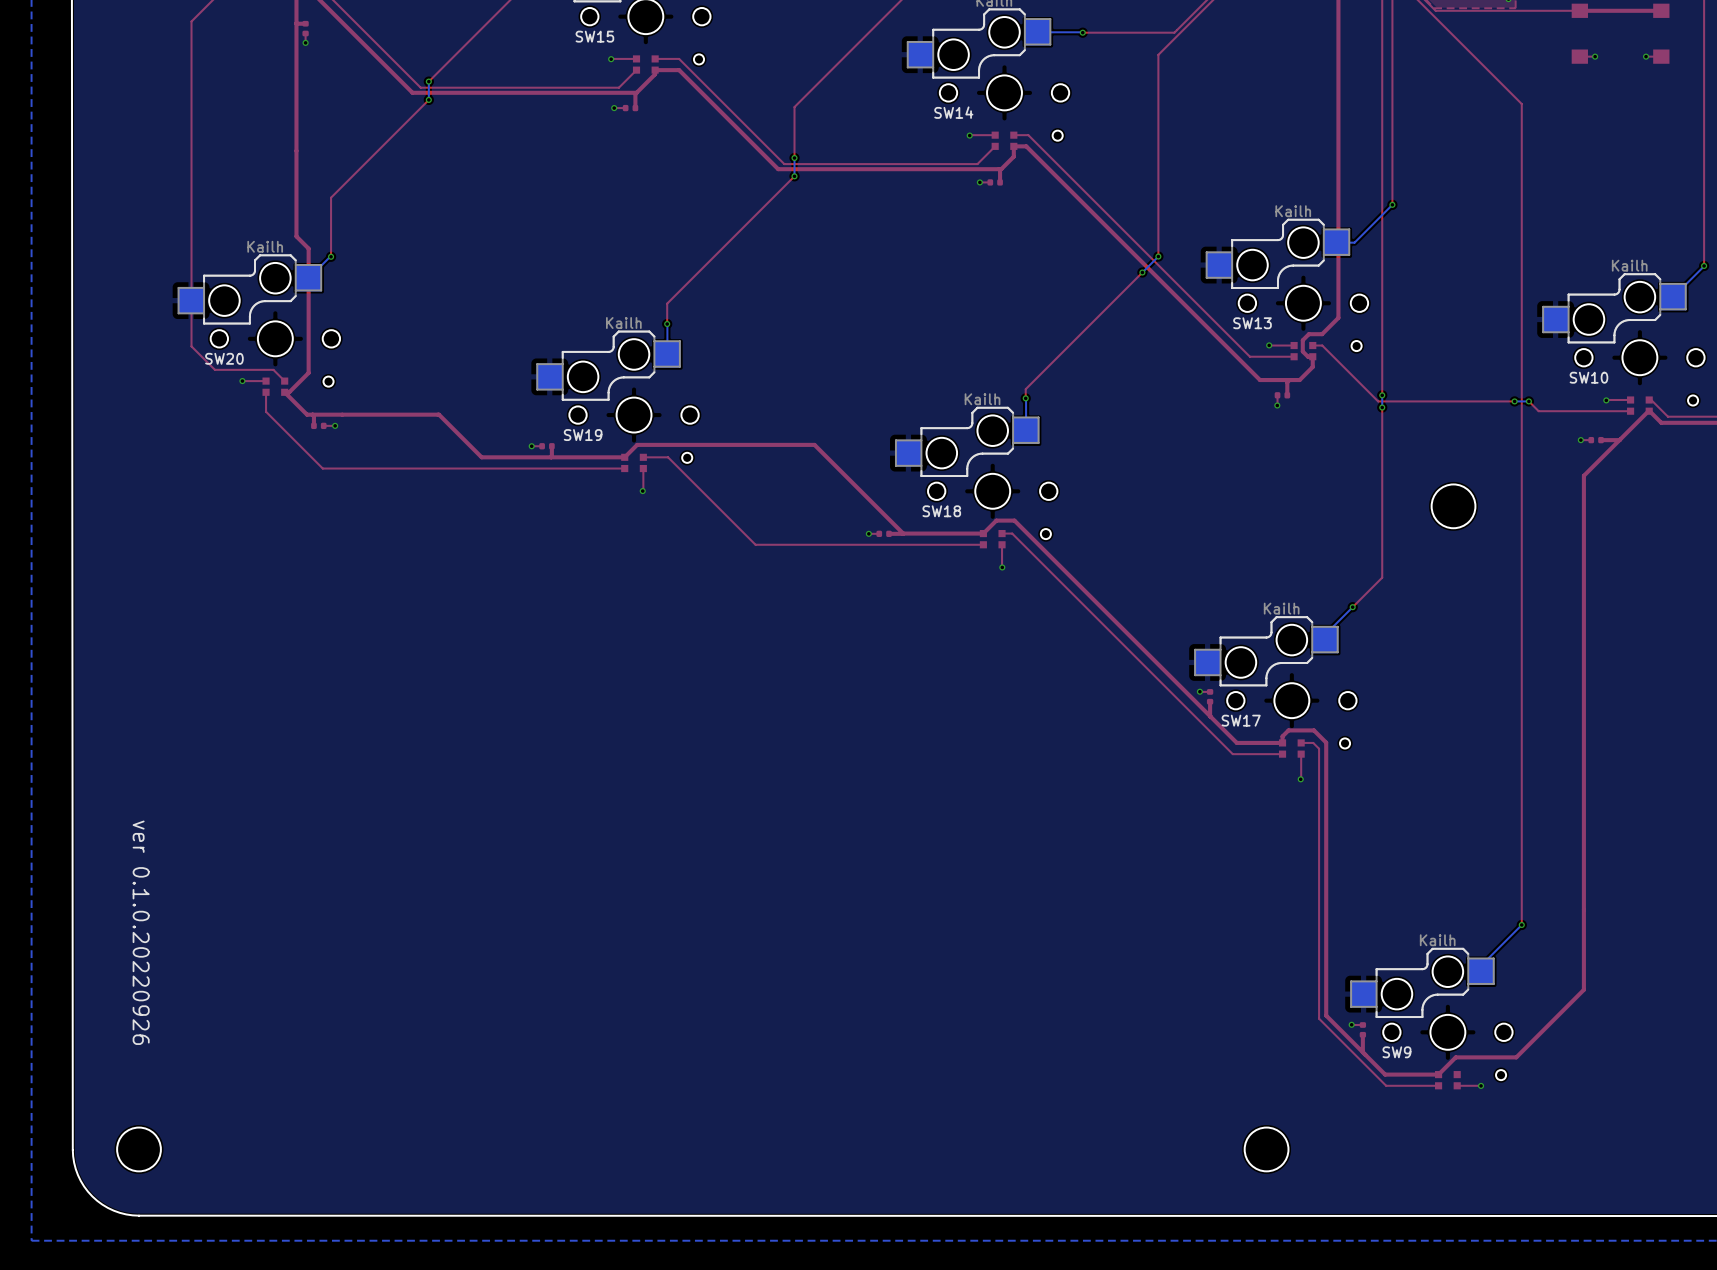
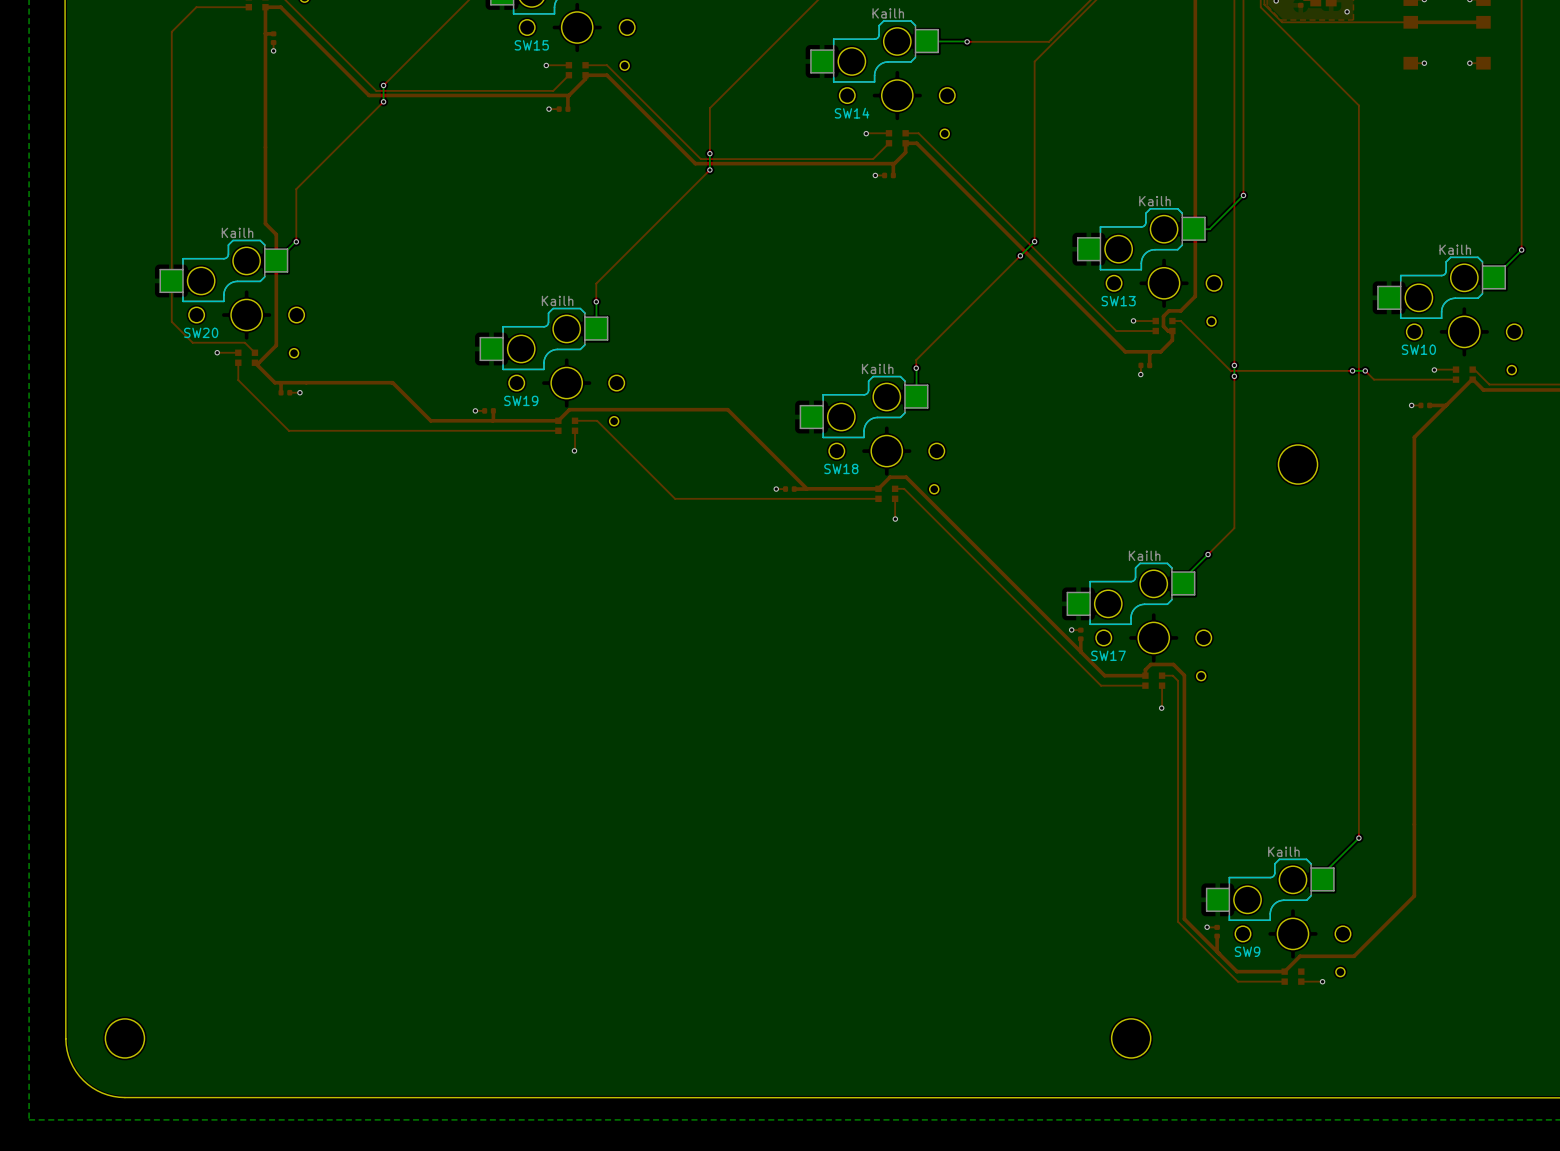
text: ver 0.1.0.20220926 (141, 932) -> none

